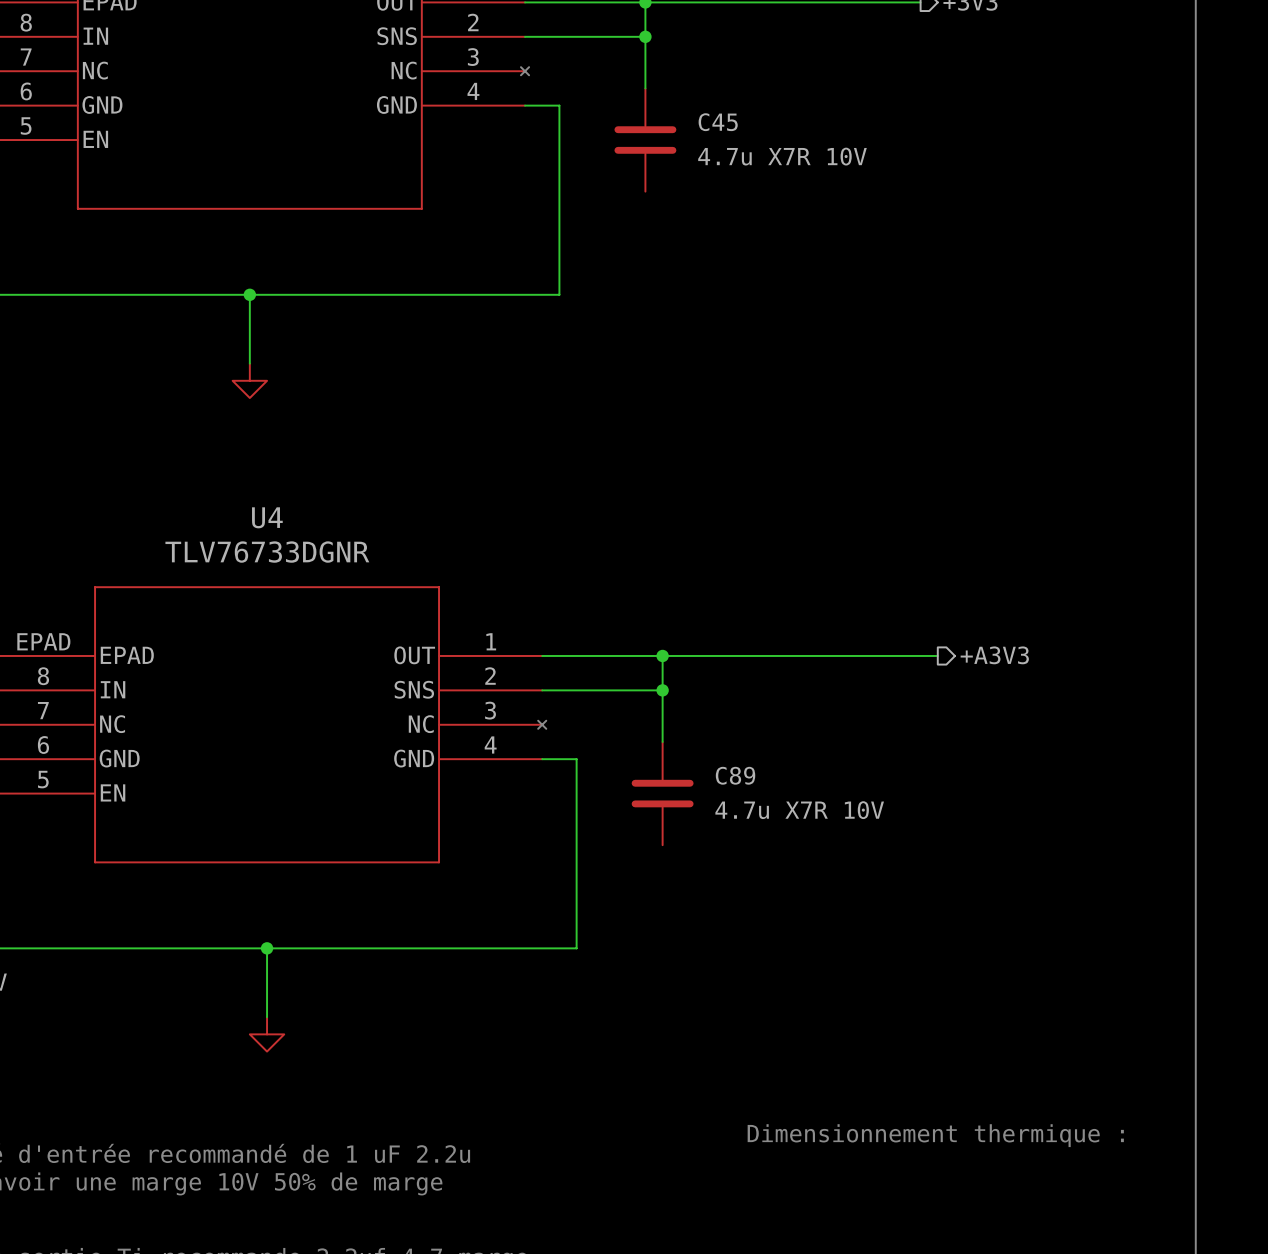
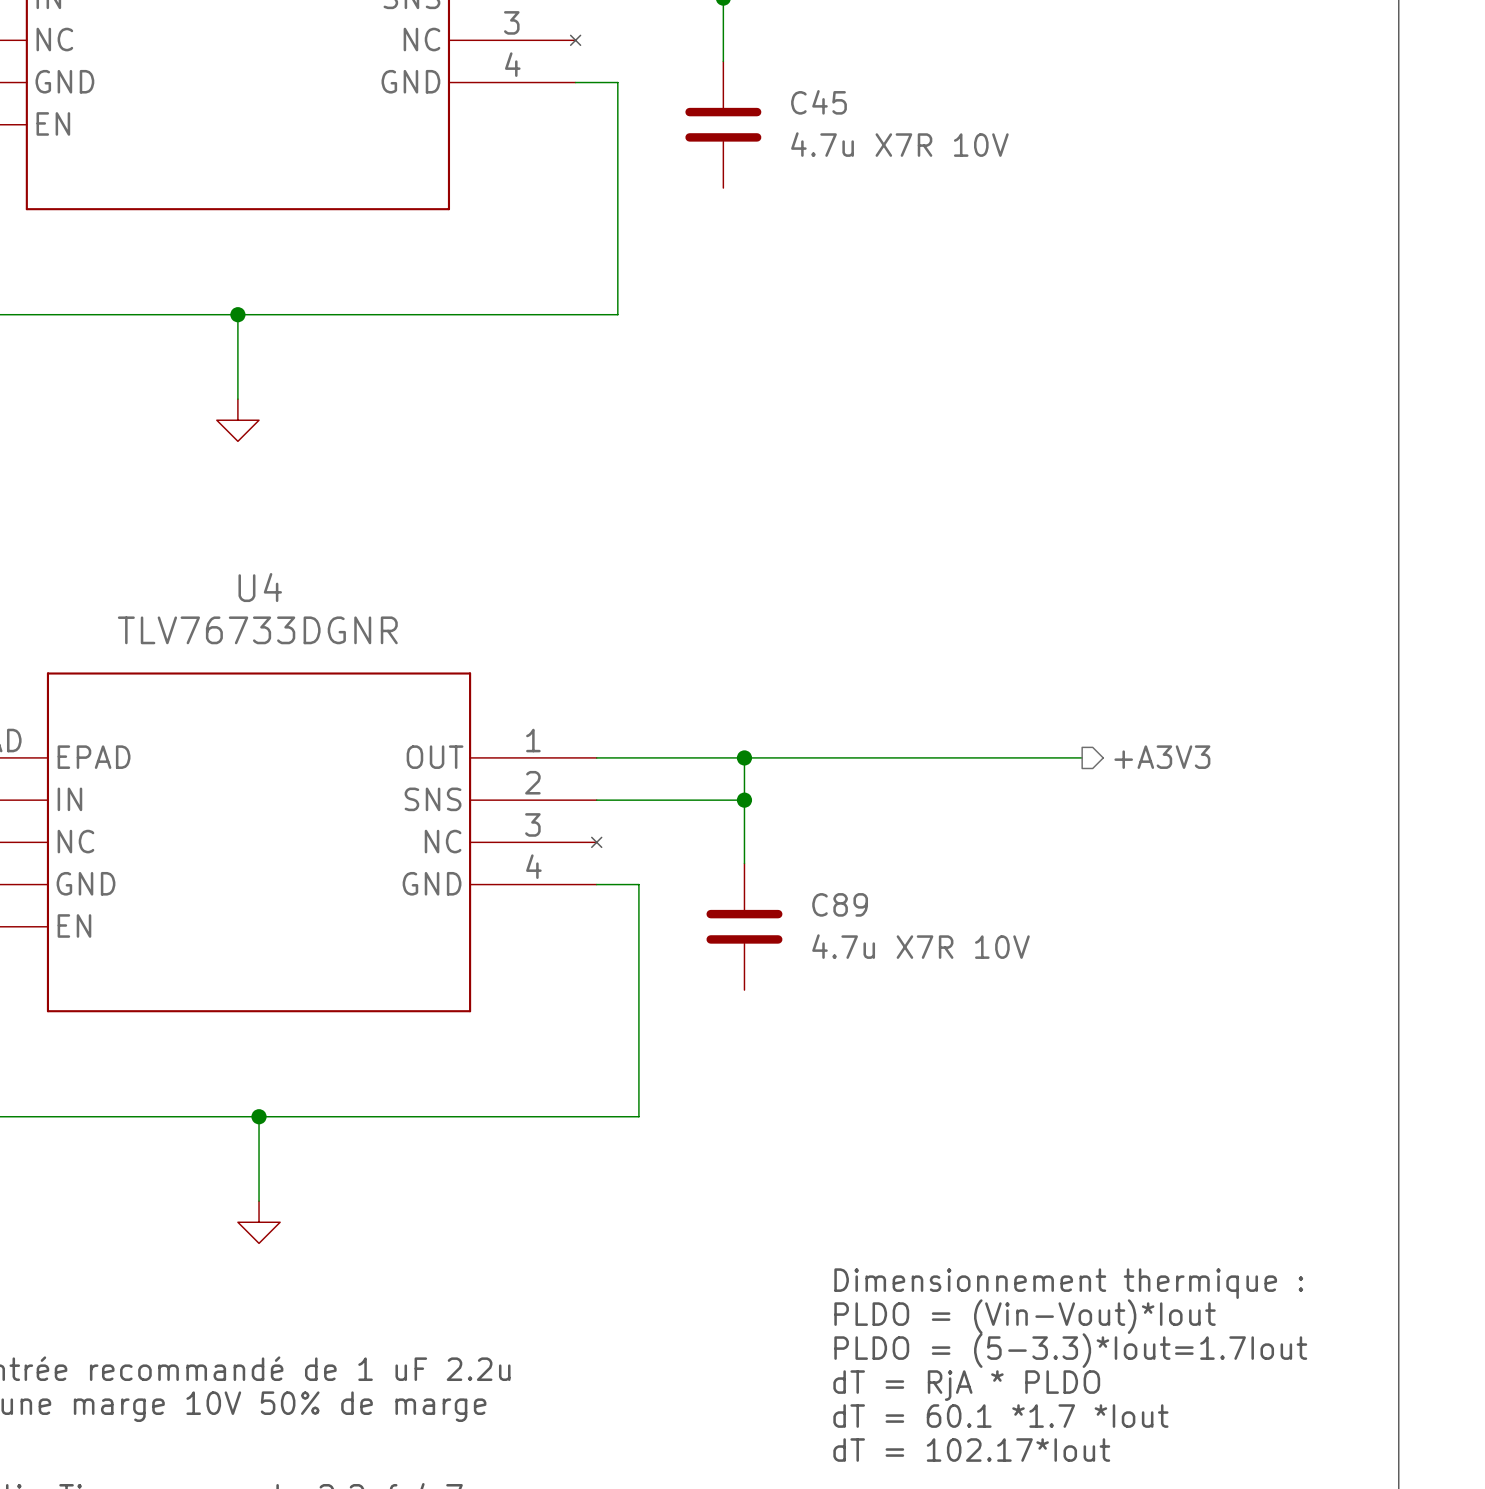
text: none -> PLDO = (Vin-Vout)*Iout (1025, 1316)
text position: Dimensionnement thermique : (935, 1135) -> Dimensionnement thermique : (1068, 1283)
text: none -> PLDO = (5-3.3)*Iout=1.7Iout (1070, 1350)
text: none -> dT = RjA * PLDO (966, 1385)
text: none -> dT = 60.1 *1.7 *Iout (1000, 1416)
text: none -> dT = 102.17*Iout (971, 1450)

